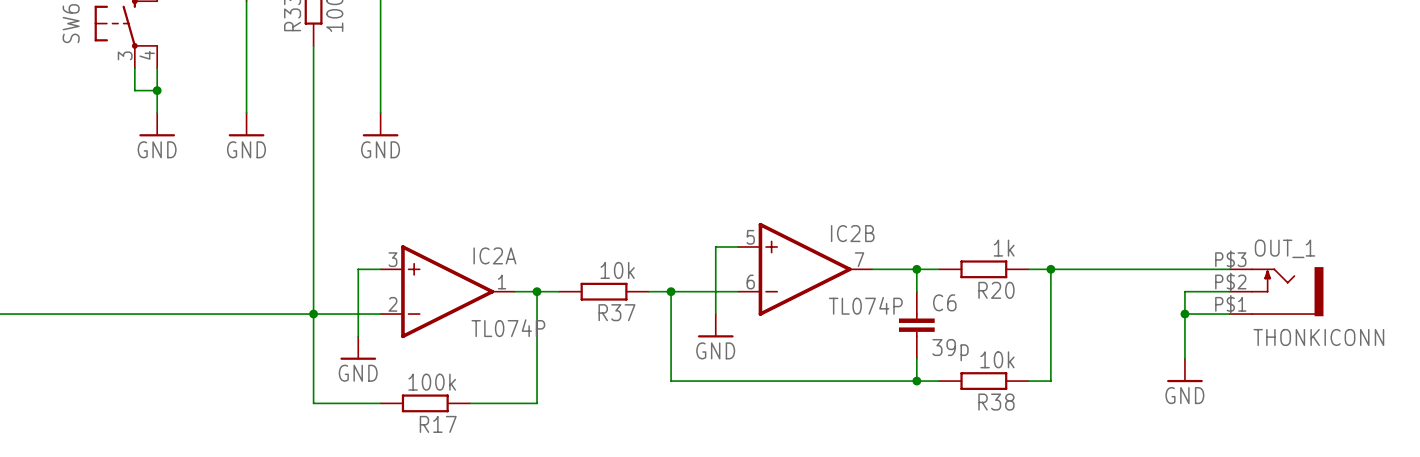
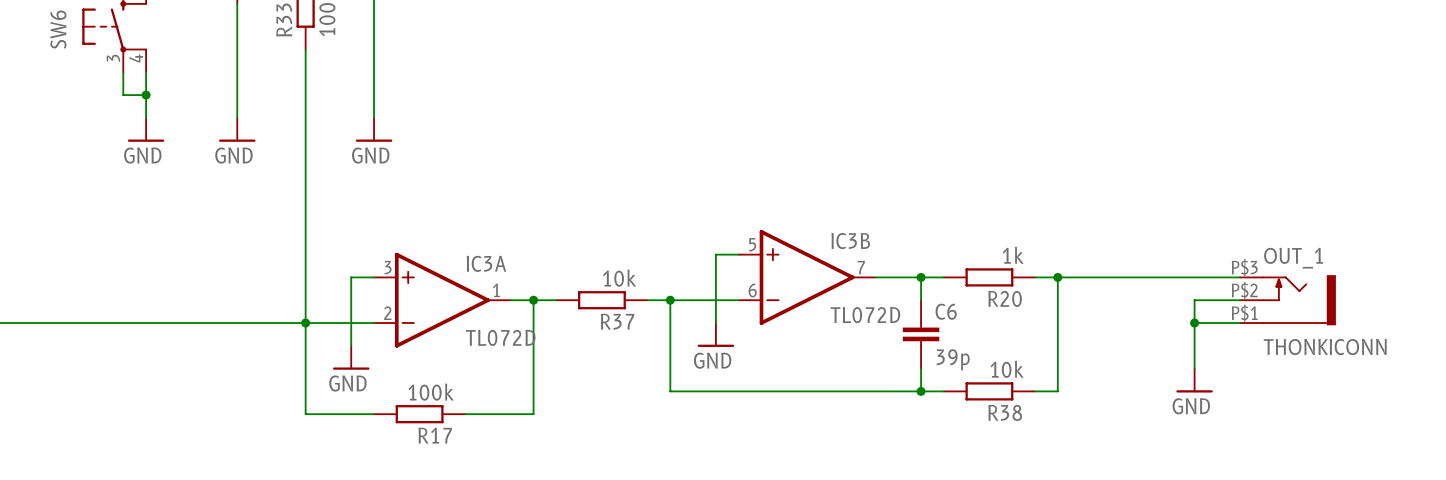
IC2B name: IC2B (852, 233) -> IC3B (850, 241)
IC2A name: IC2A (494, 255) -> IC3A (486, 263)
IC2B value: TL074P (865, 305) -> TL072D (865, 315)
IC2A value: TL074P (508, 328) -> TL072D (500, 337)

